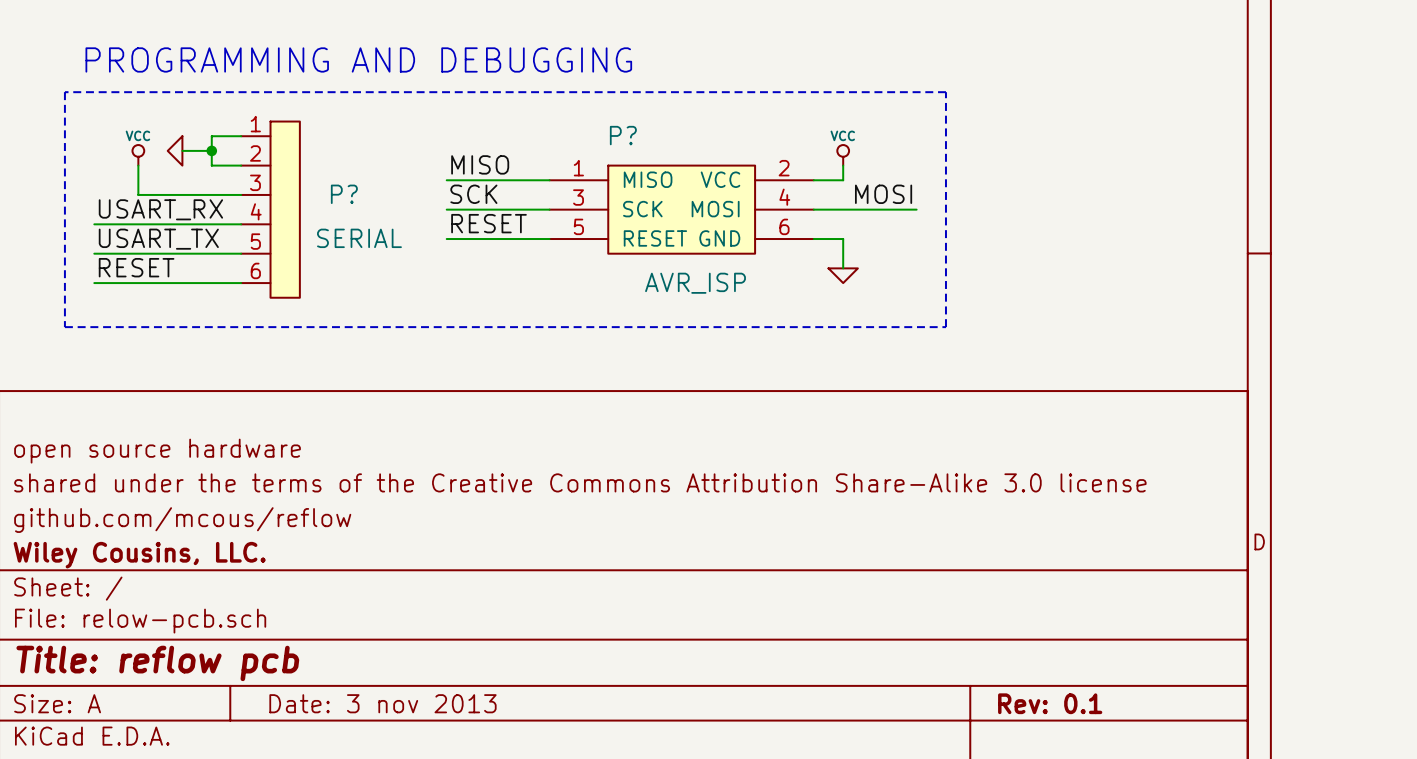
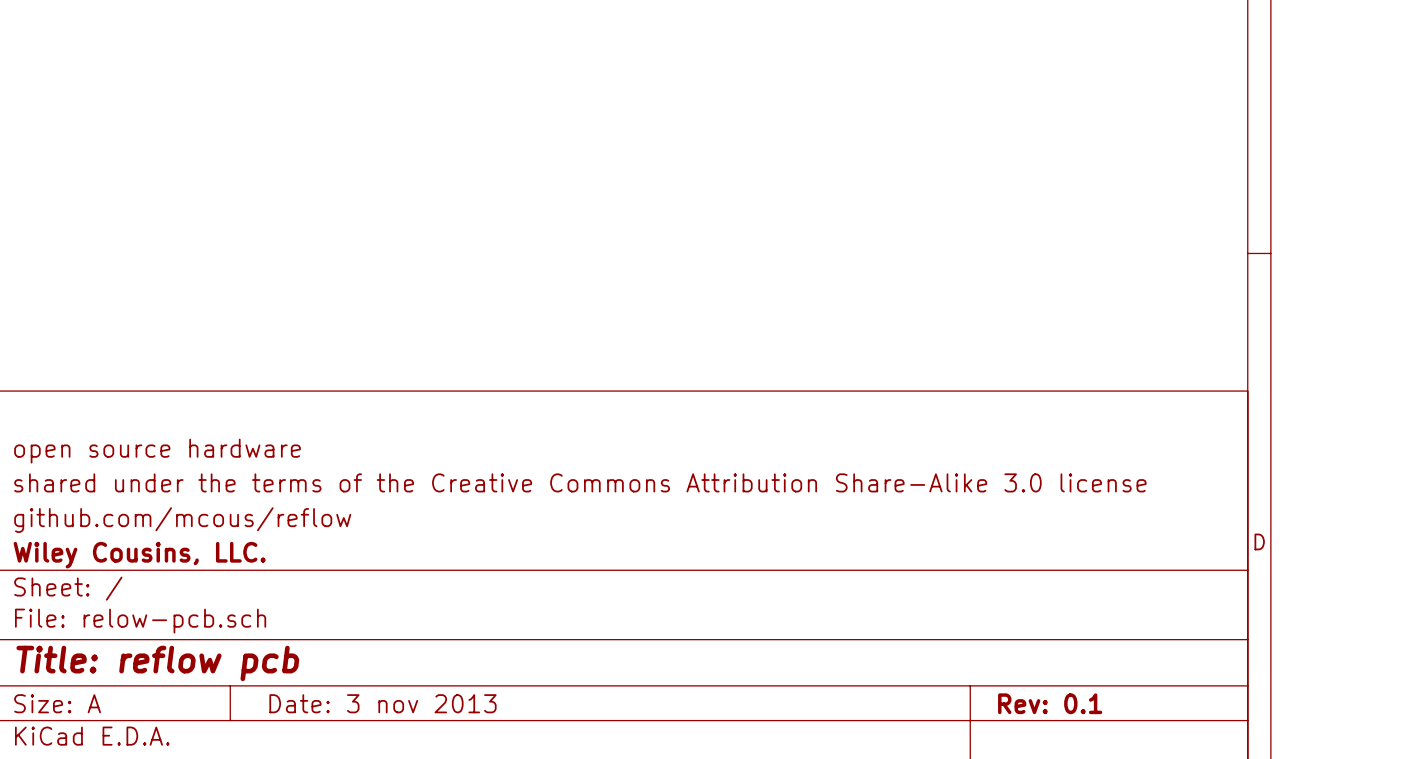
text: PROGRAMMING AND DEBUGGING (358, 59) -> none
line: (64, 92) (64, 327) (945, 327) (945, 92) (64, 92) -> none
wire: (241, 136) (211, 136) (211, 165) (241, 165) -> none
power symbol: (175, 150) -> none
wire: (182, 150) (211, 150) -> none
junction: (211, 150) -> none
power symbol: VCC (138, 155) -> none
power symbol: VCC (843, 155) -> none
label: MISO (480, 164) -> none
wire: (138, 165) (138, 194) (241, 194) -> none
wire: (843, 165) (843, 180) (813, 180) -> none
wire: (446, 180) (549, 180) -> none
label: SCK (473, 194) -> none
label: MOSI (883, 194) -> none
label: USART_RX (160, 209) -> none
P?: SERIAL (270, 209) -> none
wire: (446, 209) (549, 209) -> none
P?: AVR_ISP (681, 209) -> none
wire: (813, 209) (916, 209) -> none
label: RESET (489, 223) -> none
wire: (94, 224) (241, 224) -> none
label: USART_TX (158, 239) -> none
wire: (446, 239) (549, 239) -> none
wire: (813, 239) (843, 239) (843, 268) -> none
wire: (94, 253) (241, 253) -> none
label: RESET (136, 267) -> none
power symbol: (843, 275) -> none
wire: (94, 283) (241, 283) -> none

